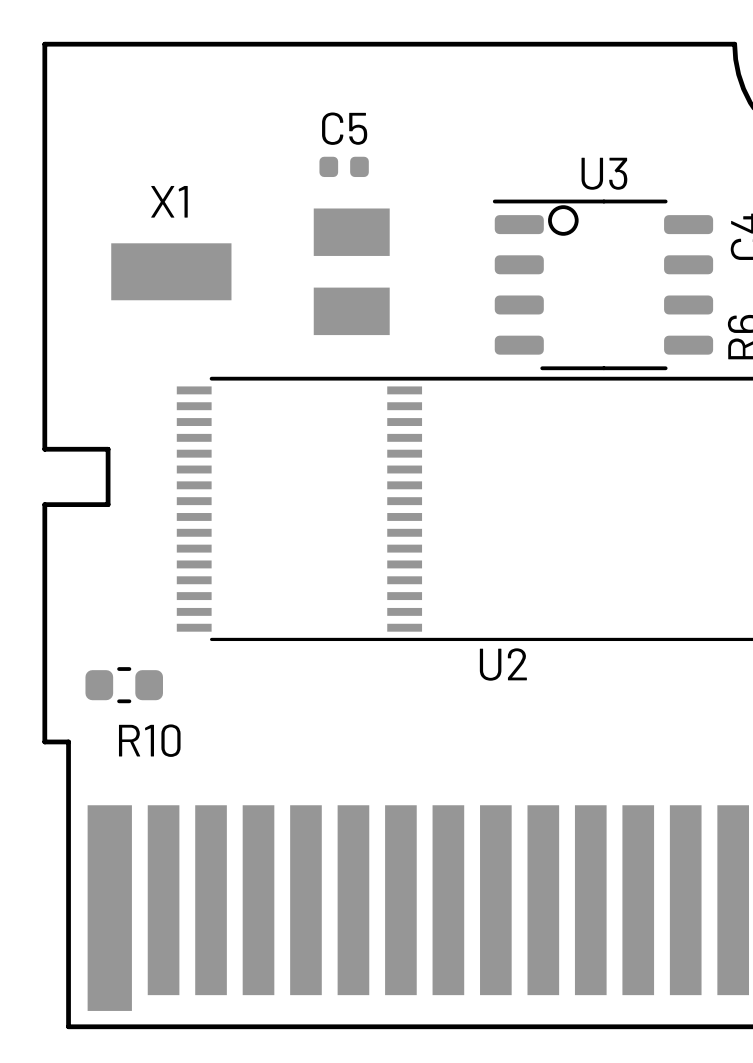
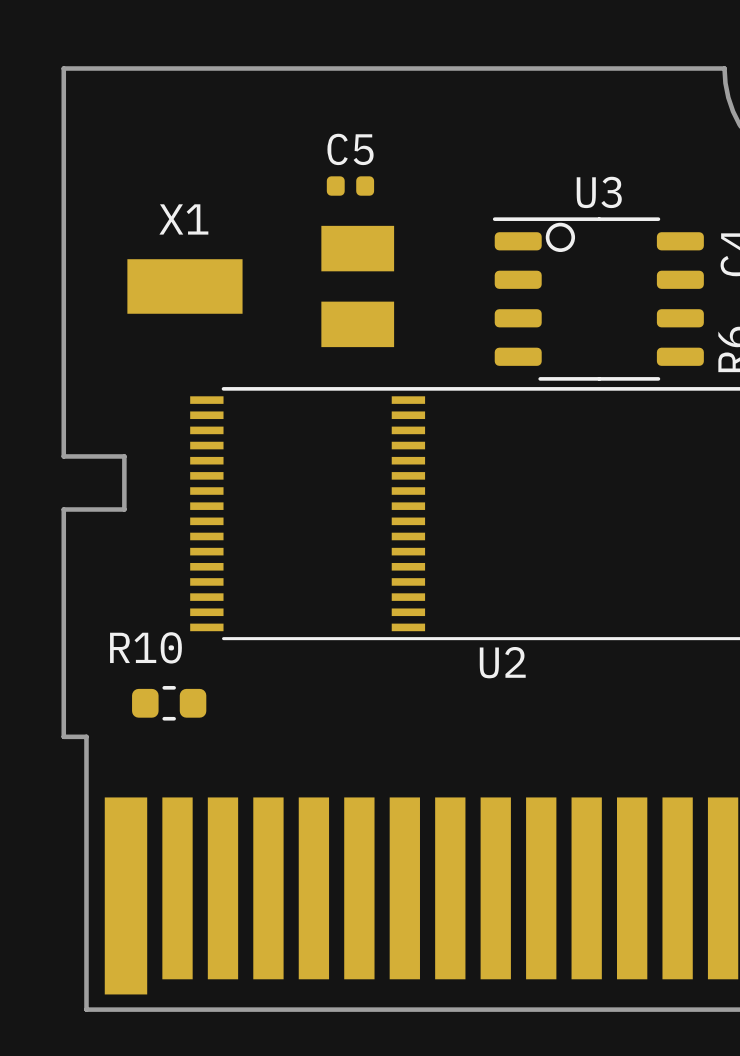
R10 position: (124, 685) -> (169, 703)
R10 name position: R10 (149, 740) -> R10 (145, 647)

